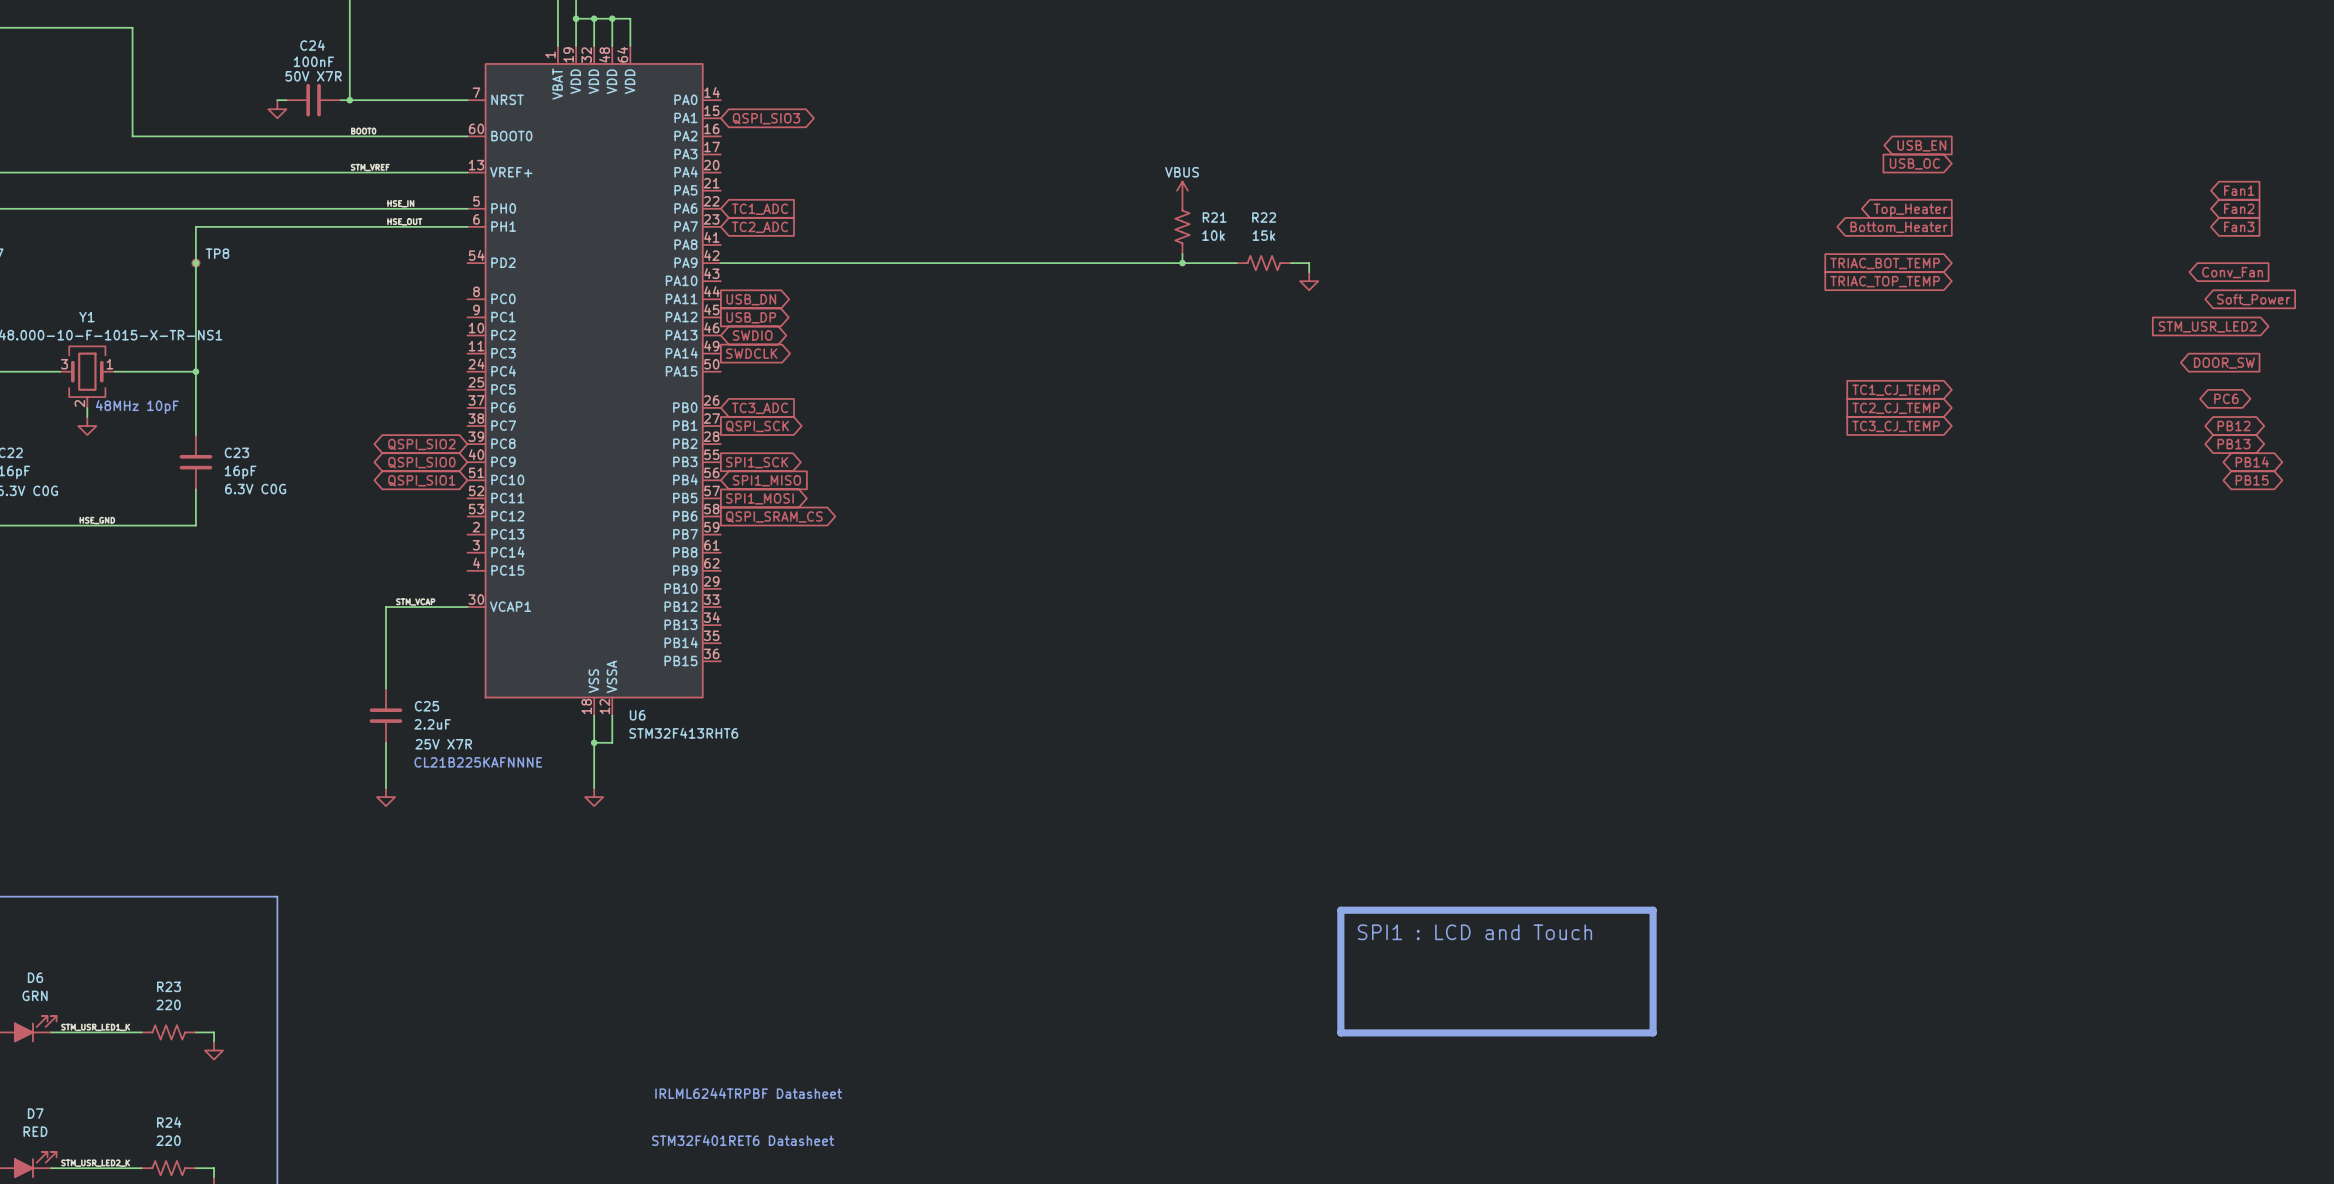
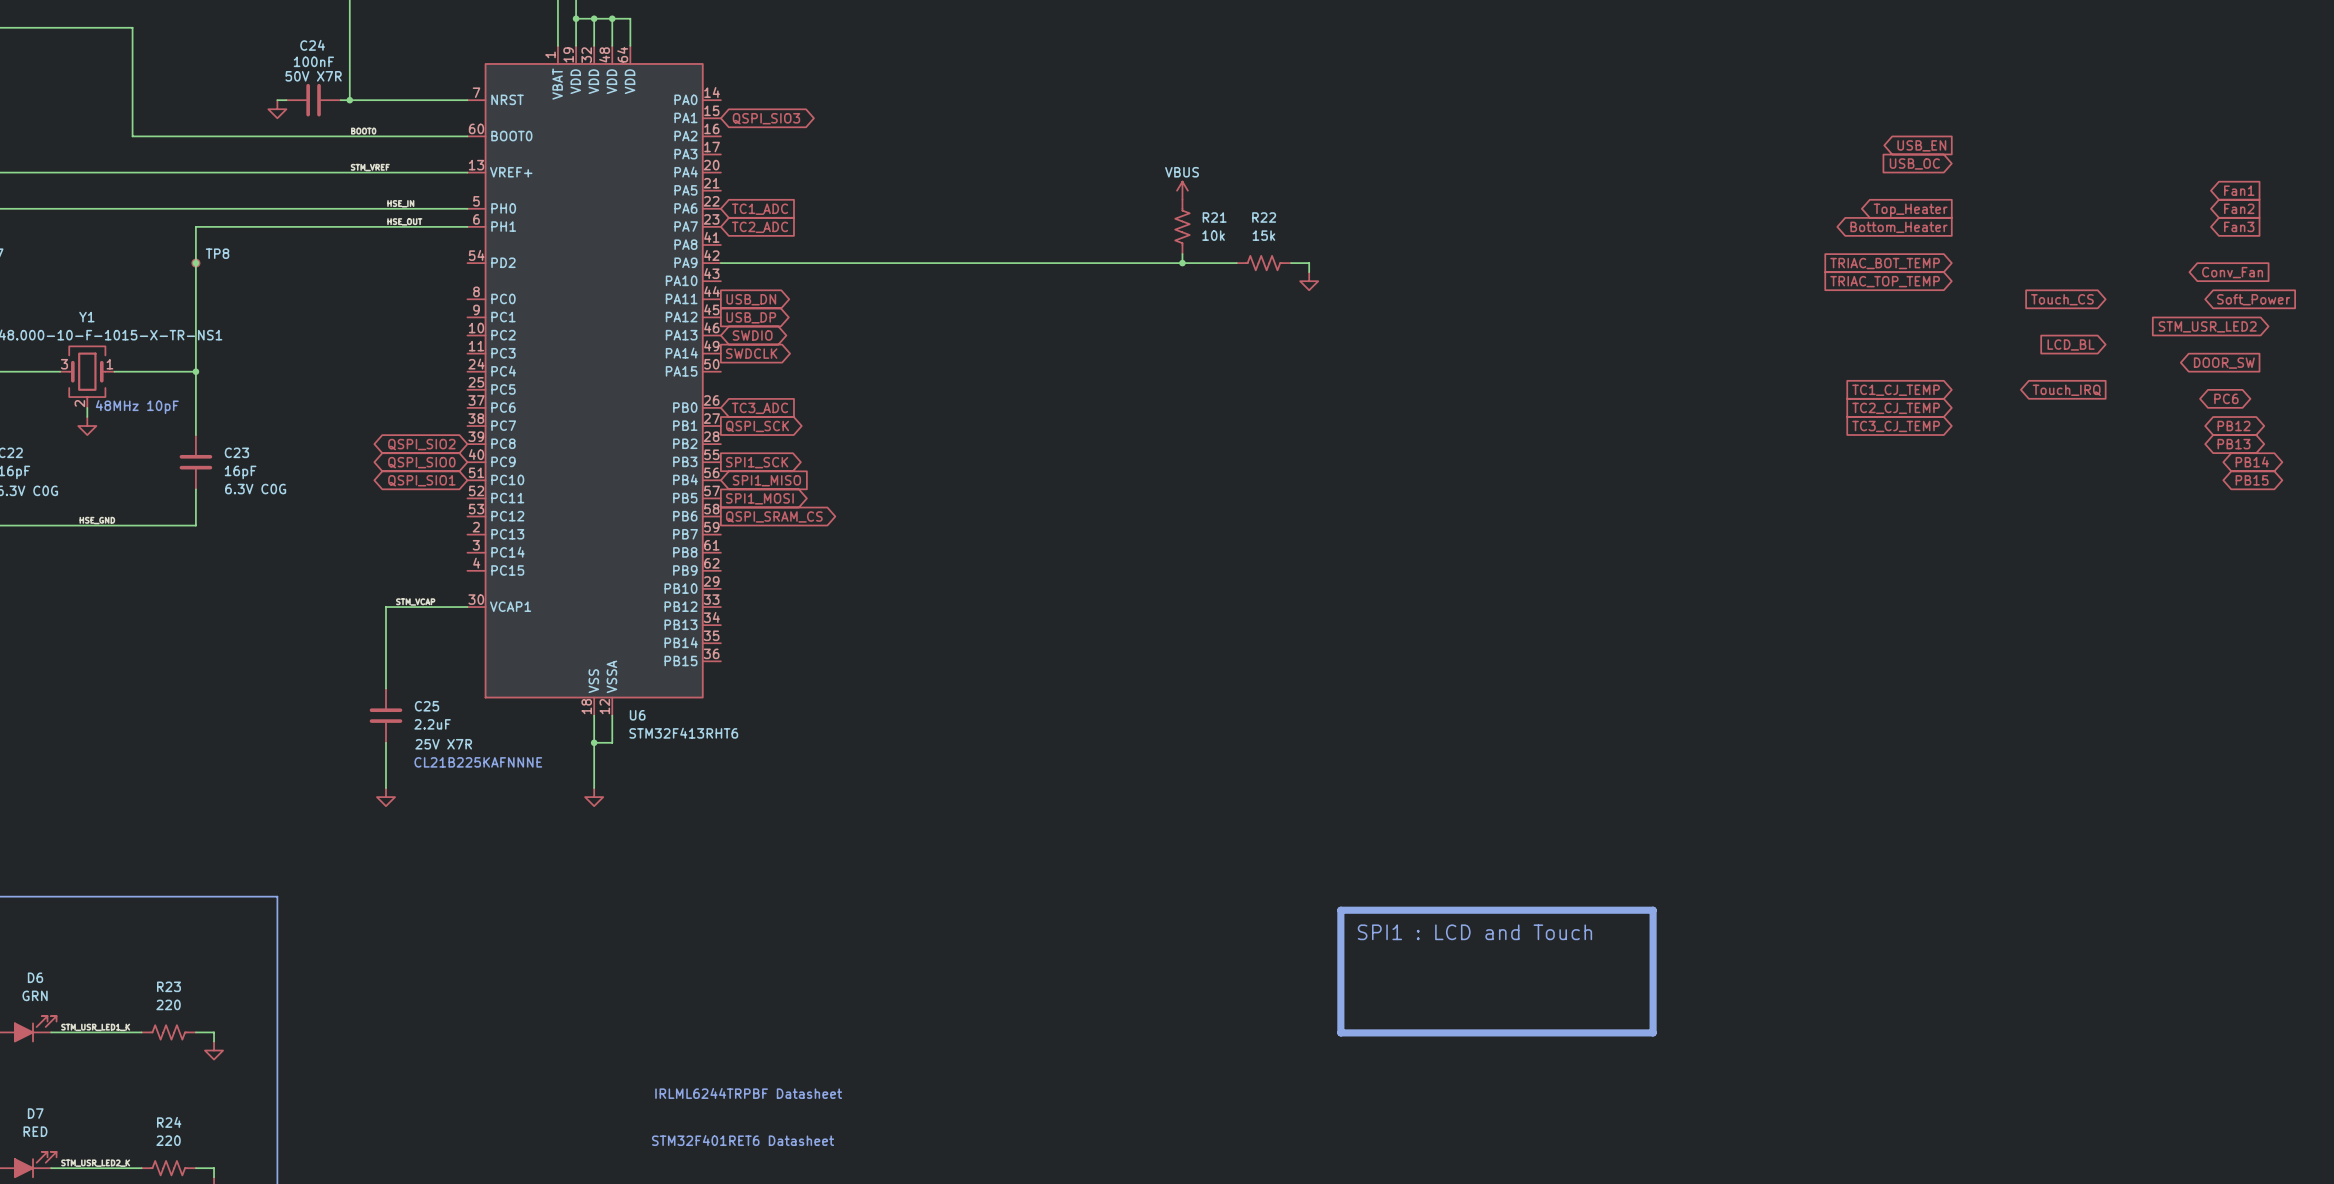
global label: none -> Touch_CS (2062, 299)
global label: none -> LCD_BL (2071, 344)
global label: none -> Touch_IRQ (2066, 390)

